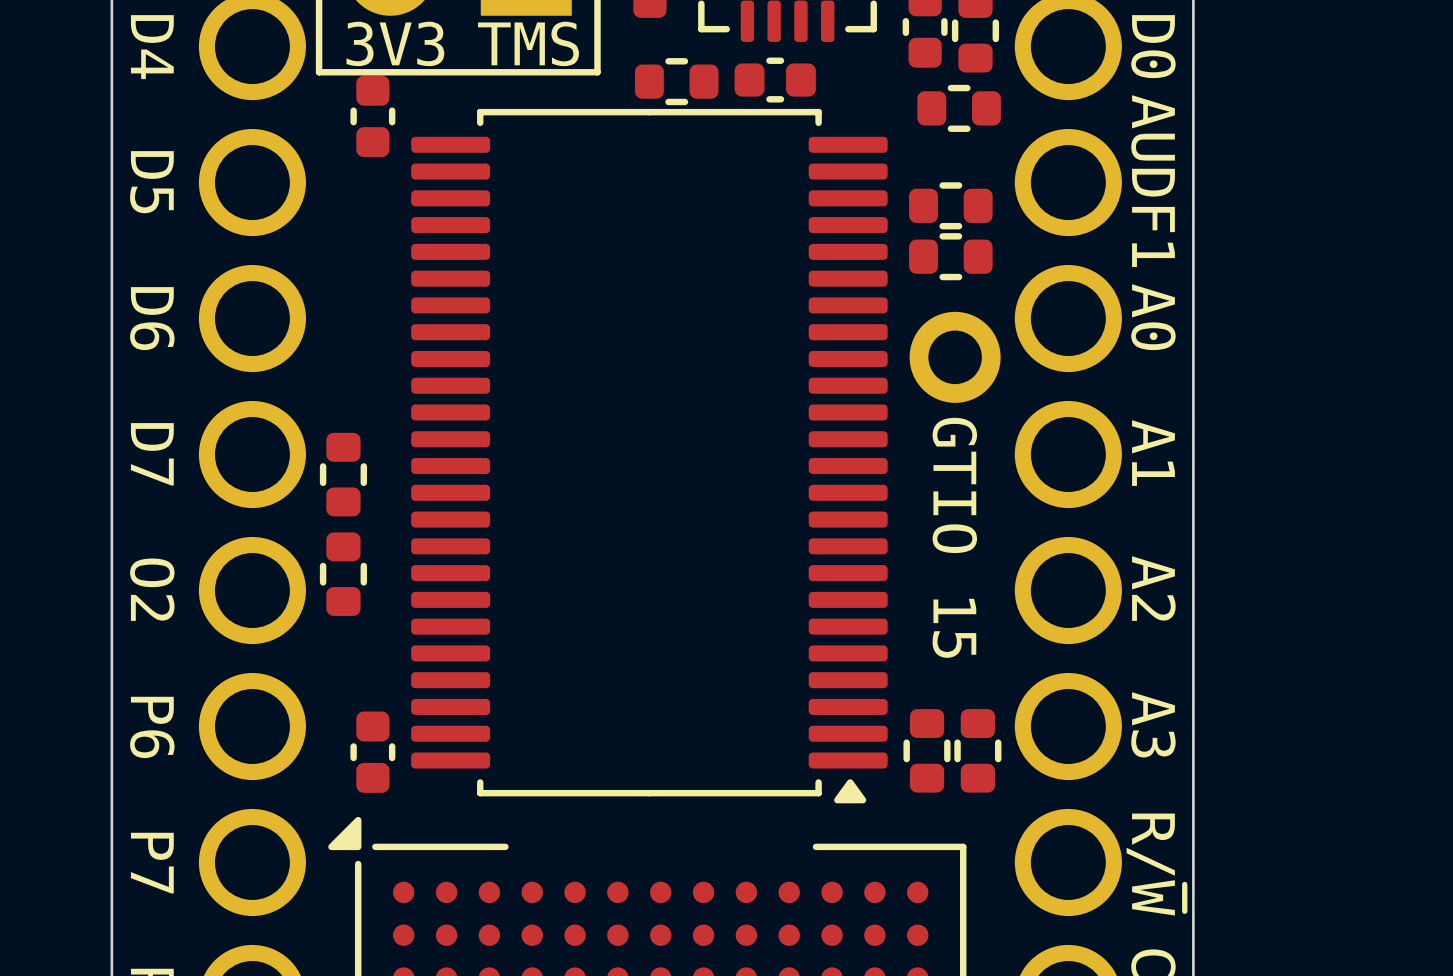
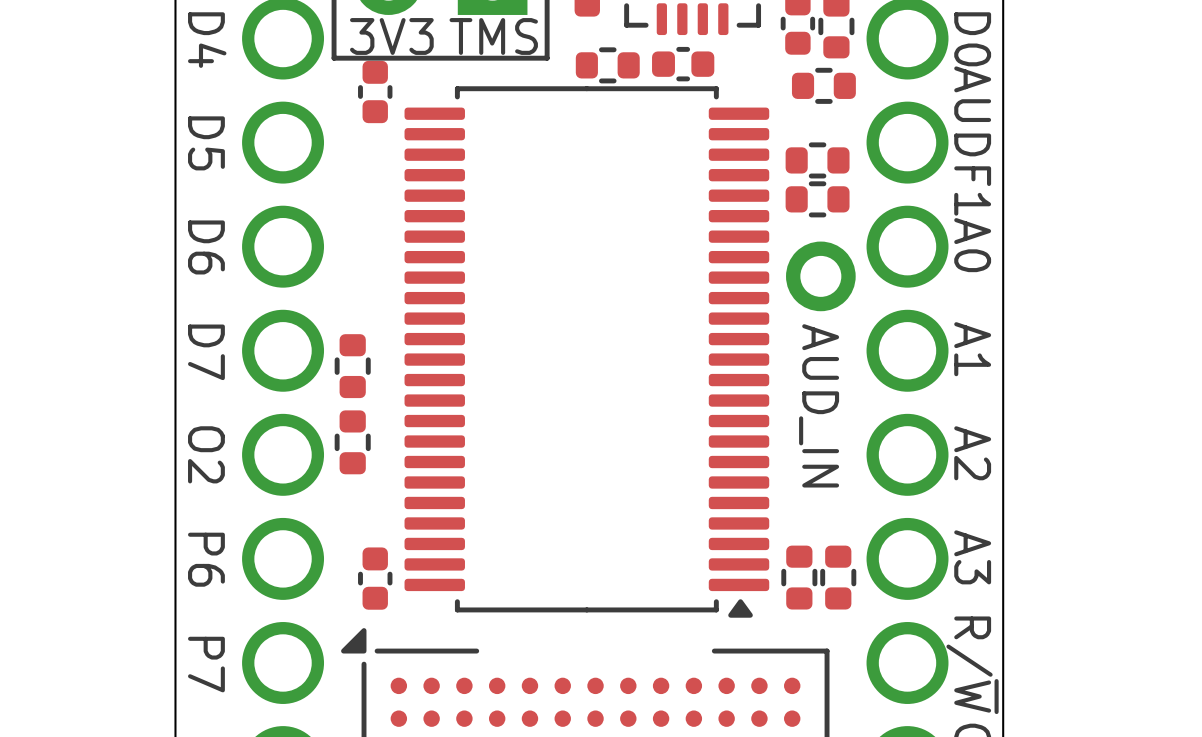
text: GTIO 15 (954, 537) -> AUD_IN (819, 405)

